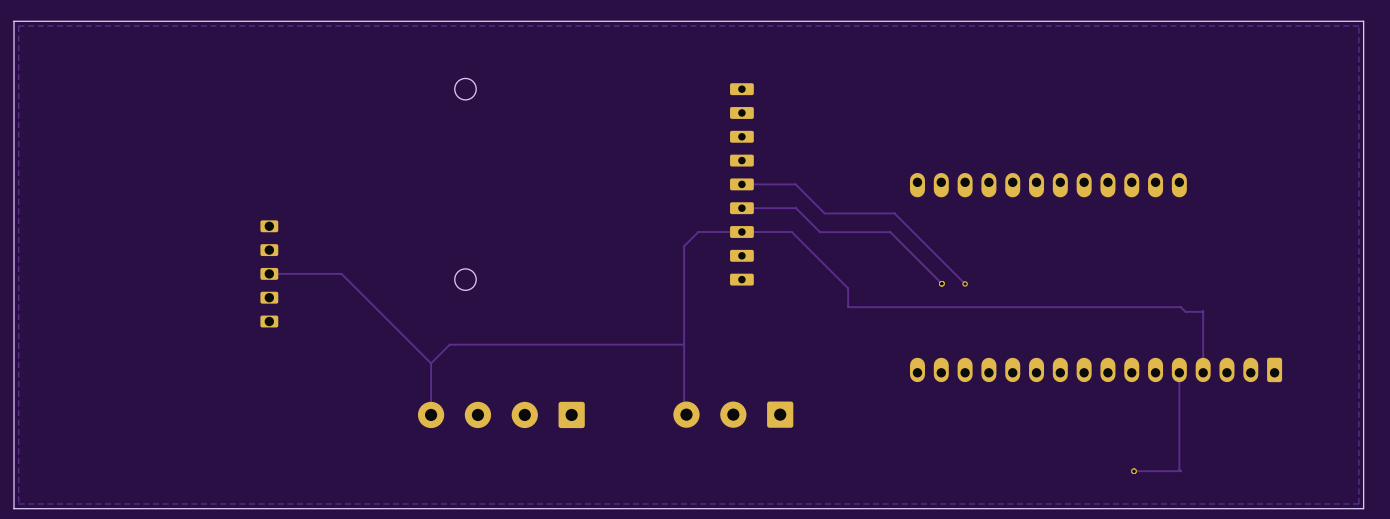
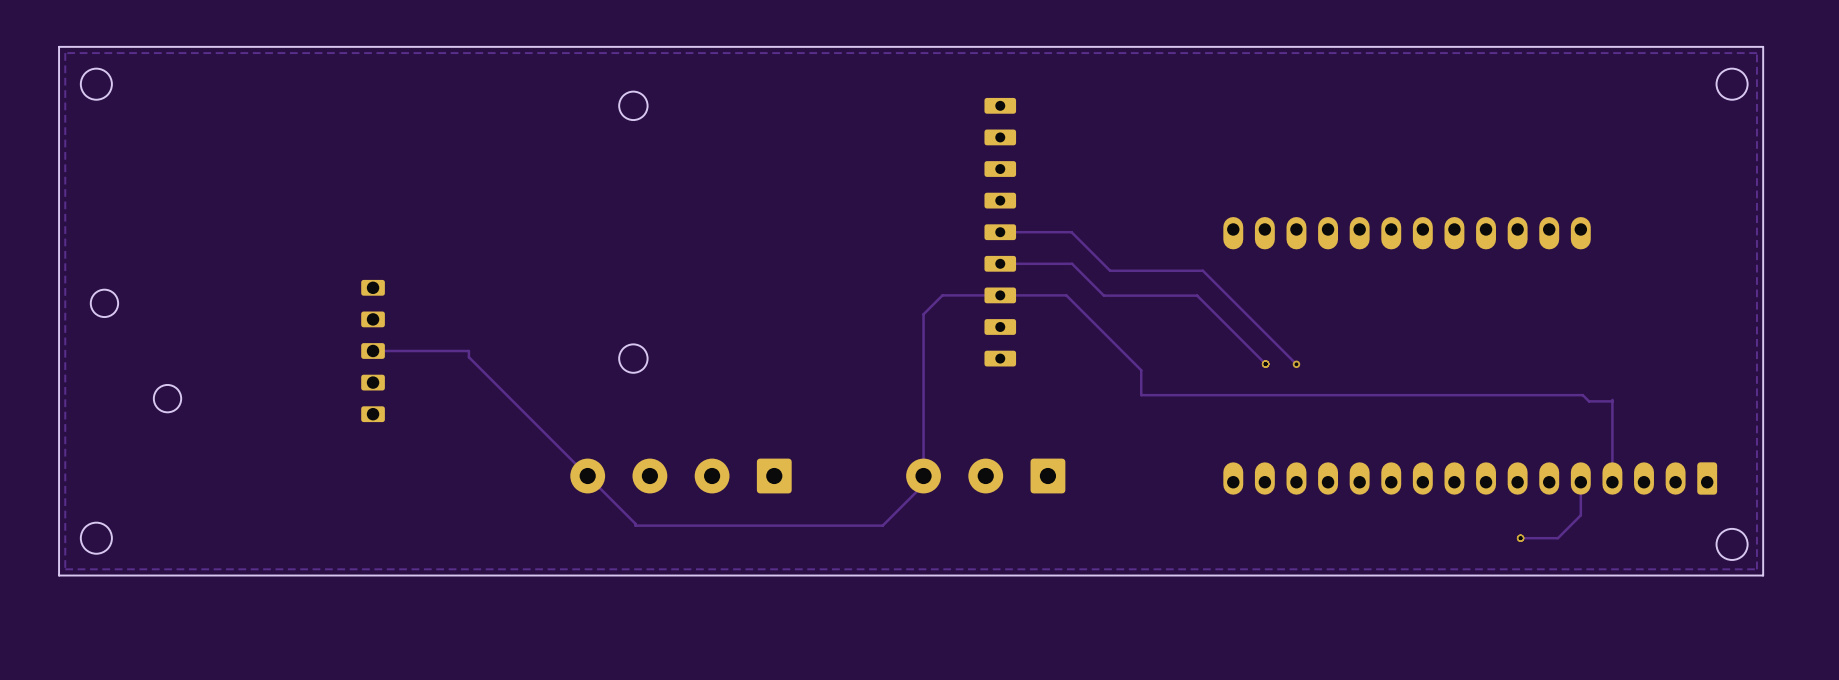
board edge: (1363, 21) (14, 21) (14, 508) (1363, 508) (1363, 21) -> (1763, 46) (1763, 575) (59, 575) (59, 46) (1763, 46)
zone outline: (1358, 26) (18, 26) (18, 503) (1358, 503) (1358, 26) -> (1756, 53) (1756, 569) (65, 569) (65, 53) (1756, 53)
round board edge: none -> [80, 68, 113, 101]
round board edge: none -> [1716, 68, 1748, 101]
round board edge: none -> [90, 289, 119, 318]
track: (341, 273) (431, 363) -> (468, 351) (468, 357) (635, 525) (882, 525) (923, 484)
round board edge: none -> [153, 384, 182, 413]
track: (684, 344) (449, 344) (431, 363) -> none
track: (431, 363) (431, 414) -> none
track: (684, 374) (684, 414) (686, 414) -> none
track: (1179, 397) (1180, 471) (1134, 471) -> (1580, 515) (1557, 538) (1520, 538)
round board edge: none -> [80, 522, 113, 555]
round board edge: none -> [1716, 528, 1748, 561]
part position: (501, 414) -> (680, 476)
part position: (733, 414) -> (985, 476)
via position: (1134, 471) -> (1520, 538)

